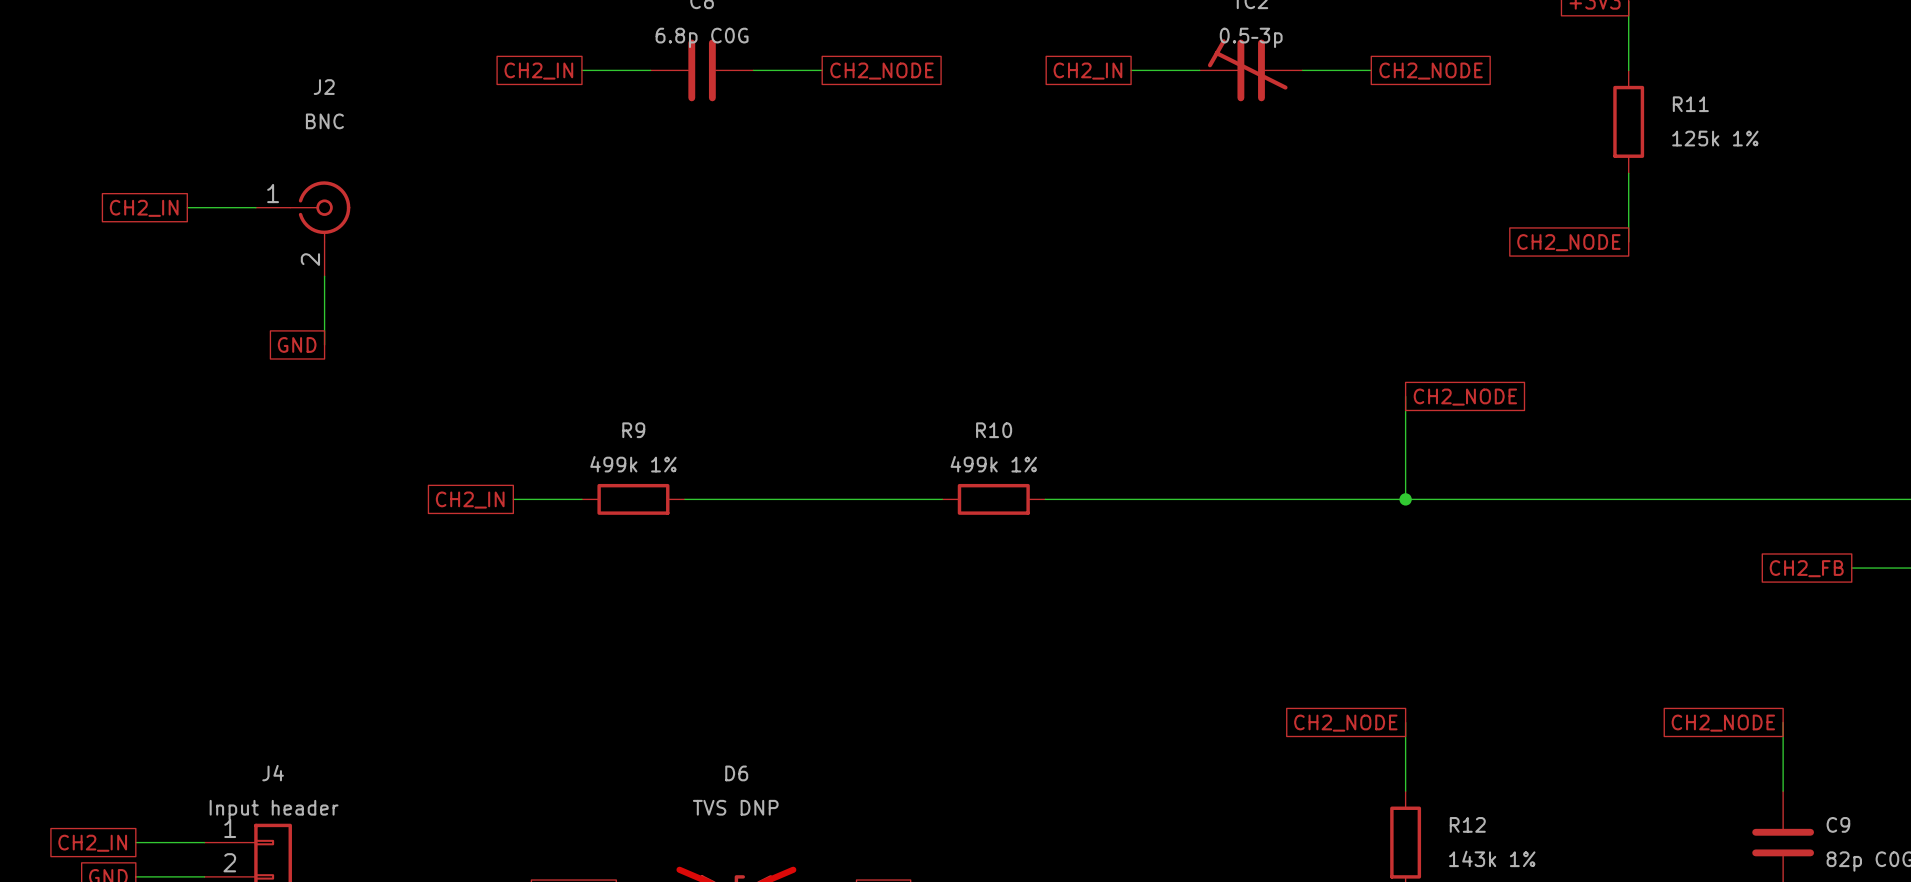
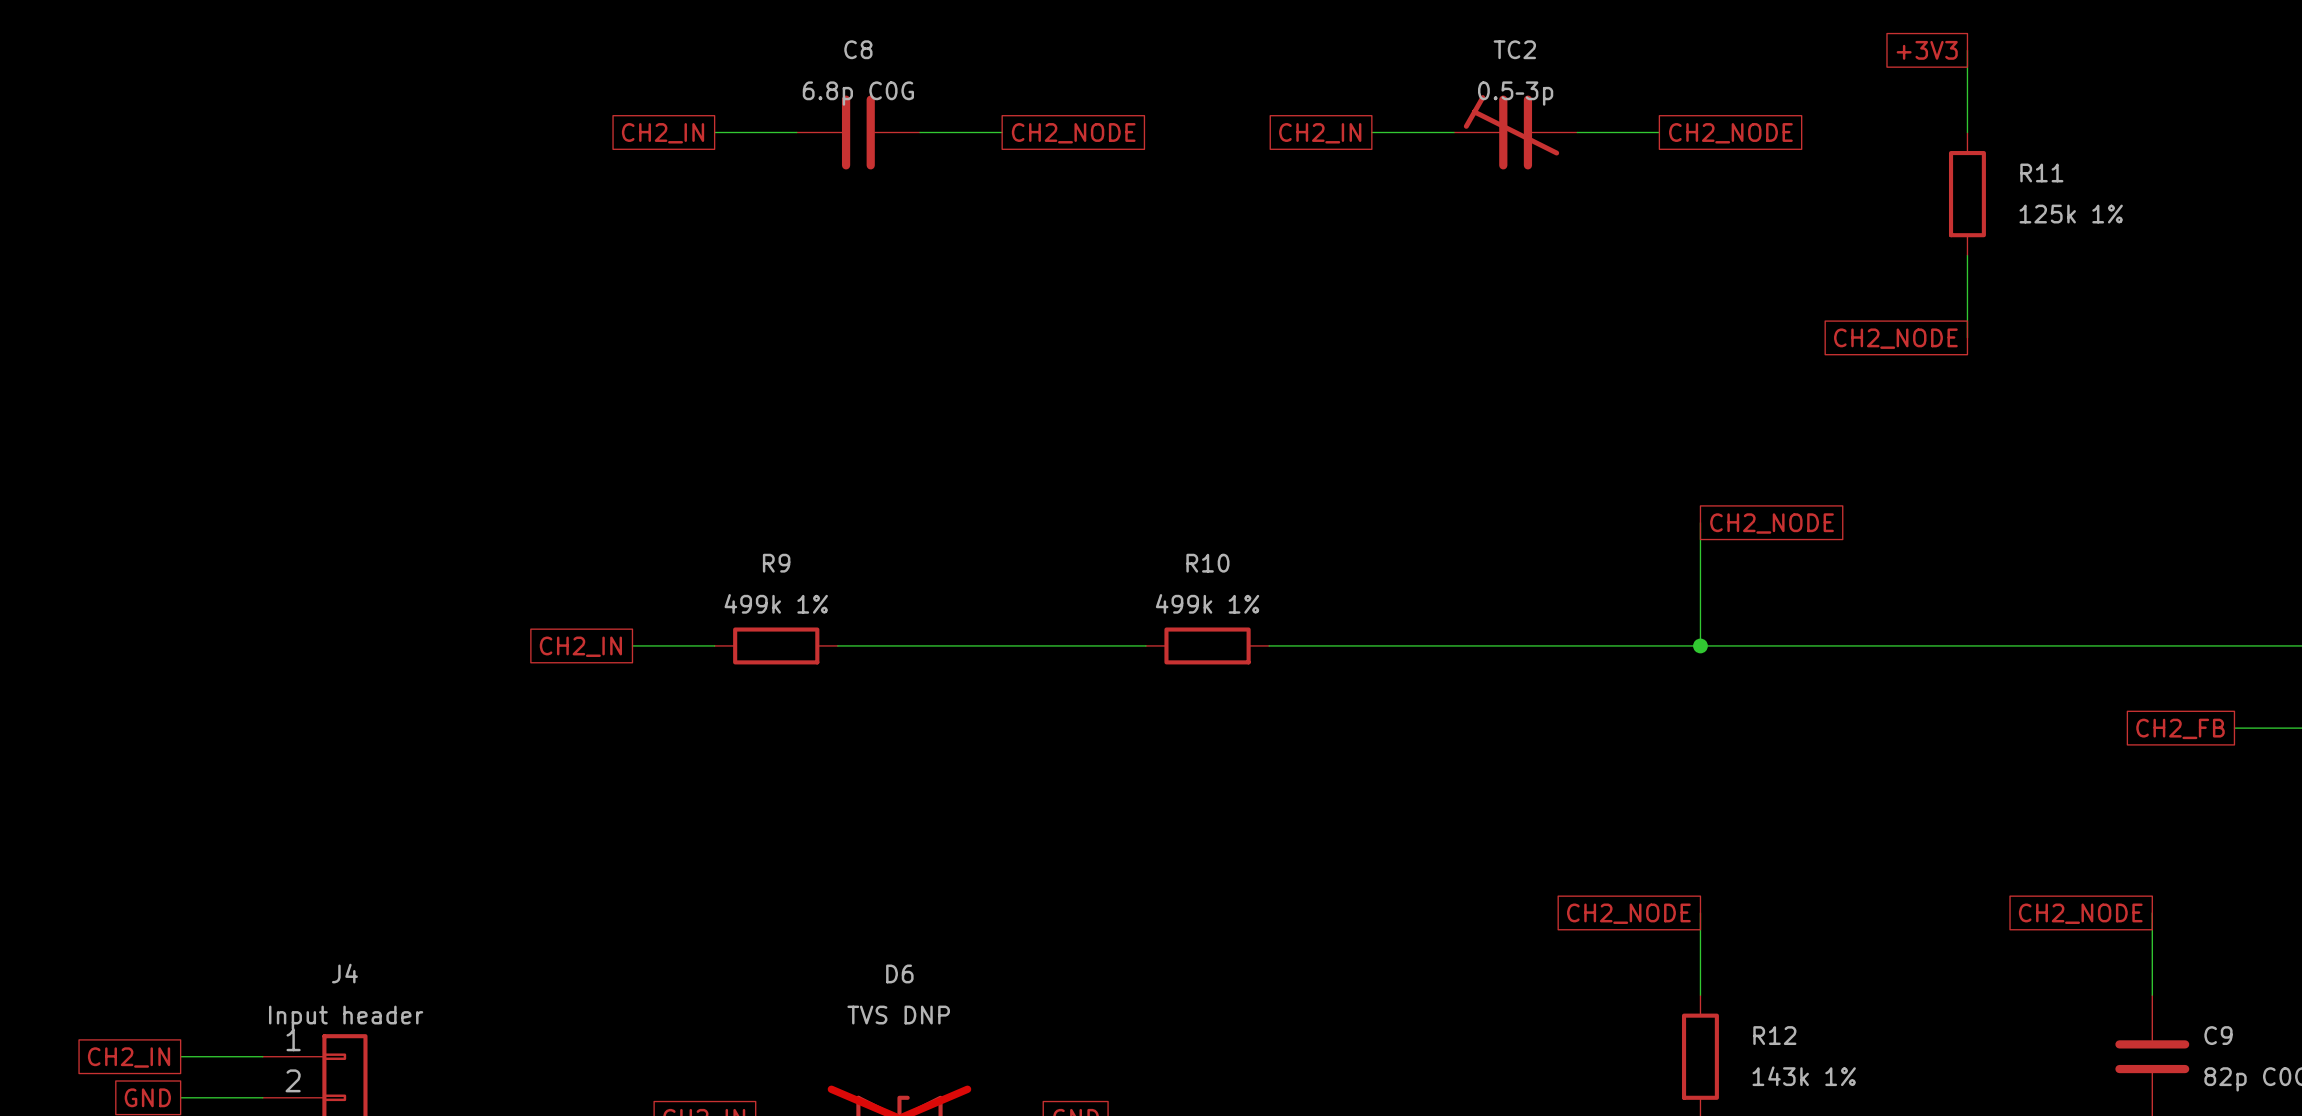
wire: (187, 207) (255, 207) -> none
global label: CH2_IN (144, 208) -> none
J2: BNC (303, 228) -> none
wire: (324, 276) (324, 344) -> none
global label: GND (297, 344) -> none

